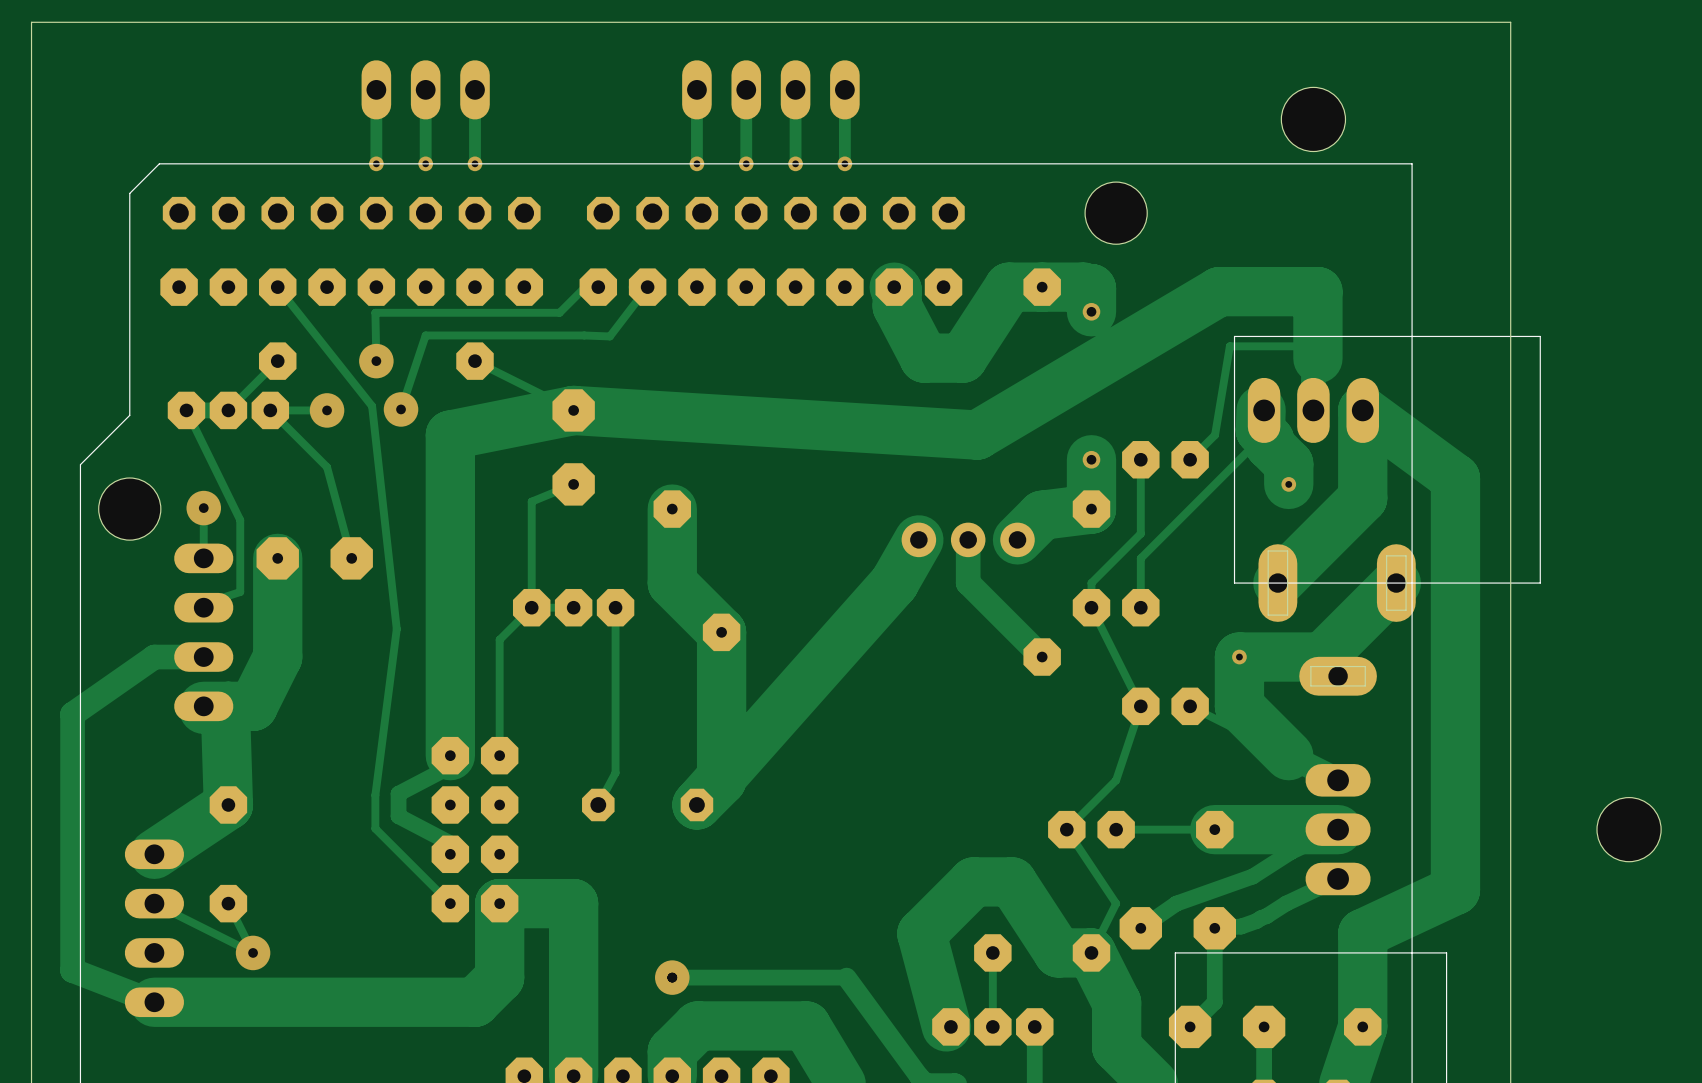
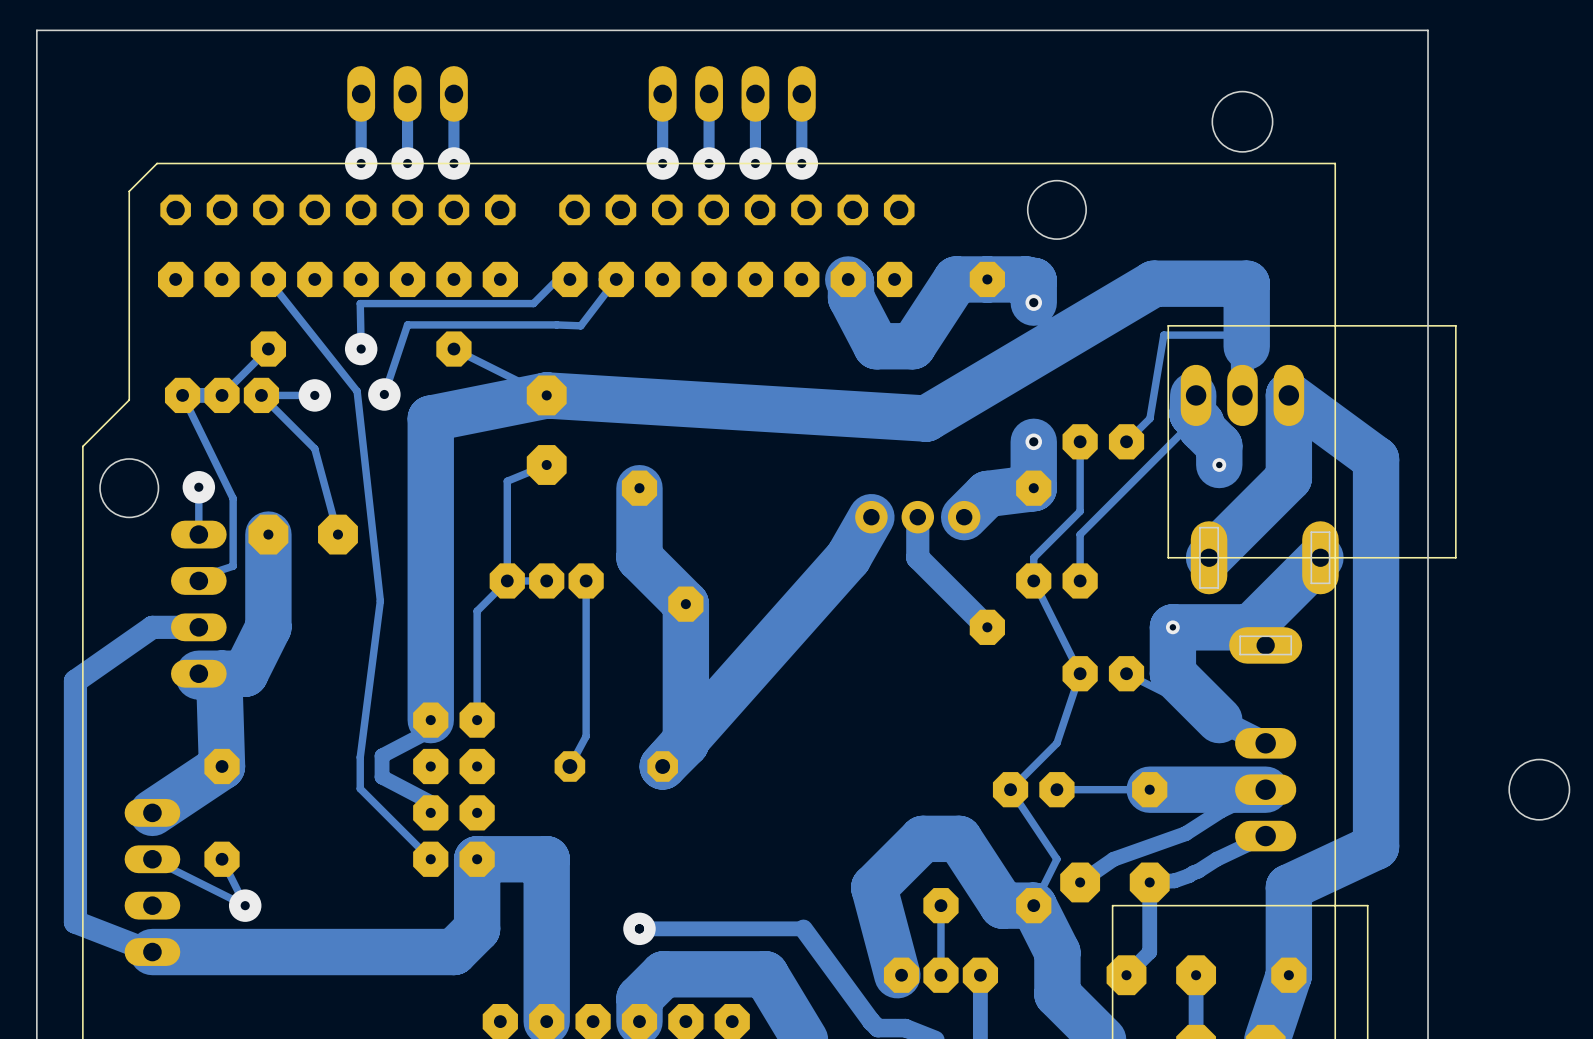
via: none -> (361, 163)
via: none -> (407, 163)
via: none -> (453, 163)
via: none -> (662, 163)
via: none -> (709, 163)
via: none -> (755, 163)
via: none -> (801, 163)

